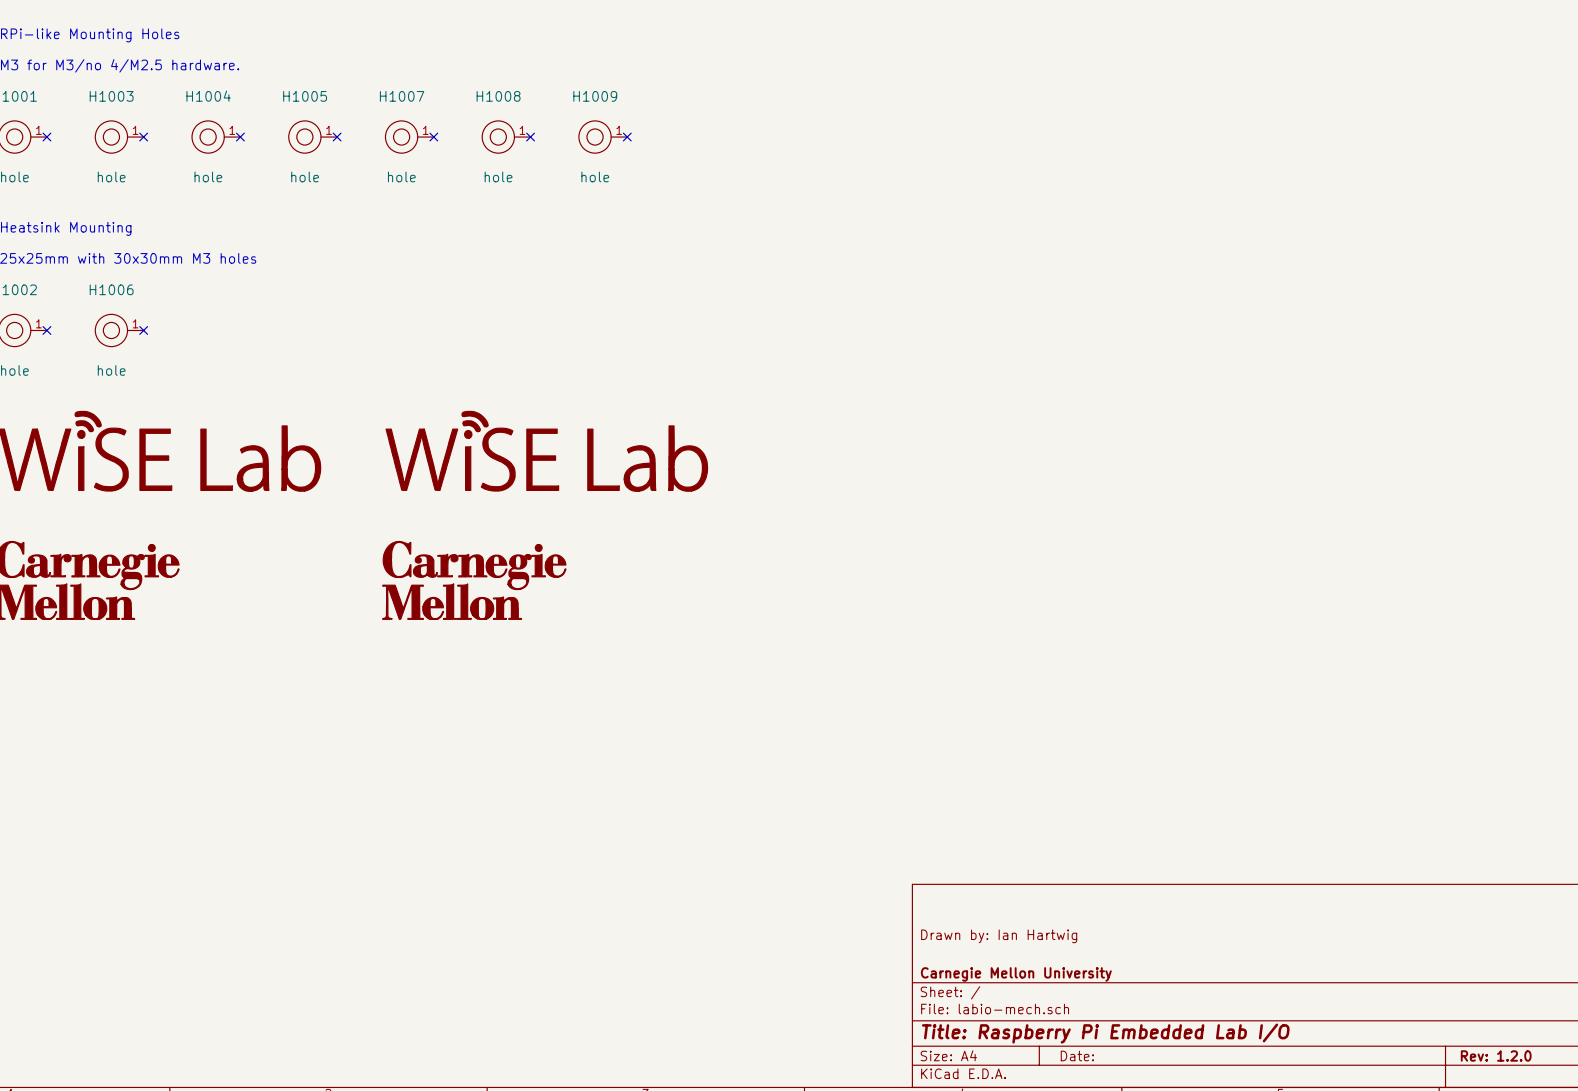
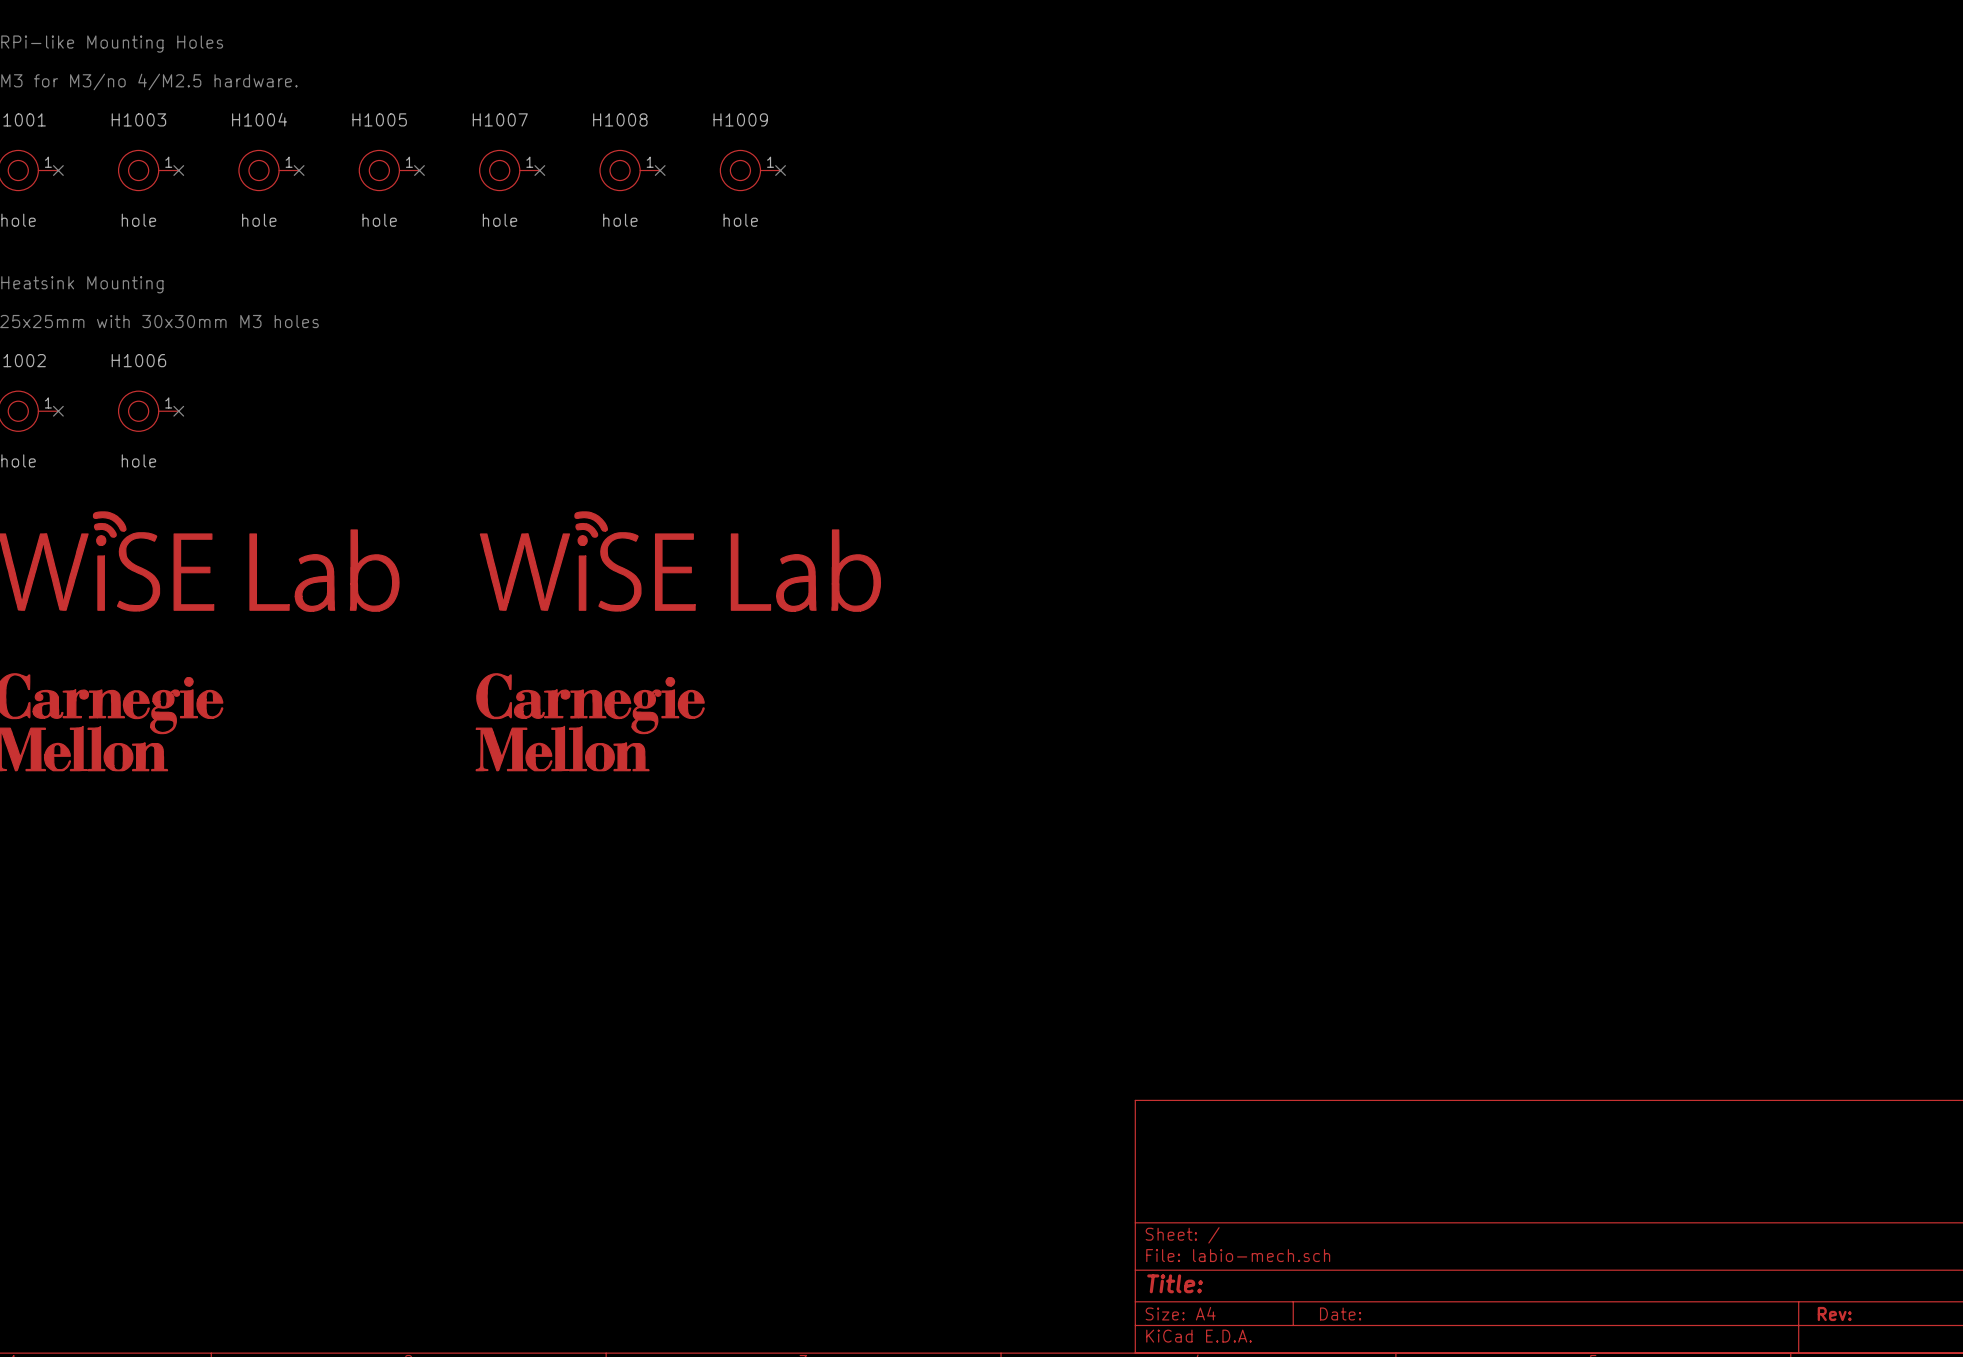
title block: Drawn by: Ian Hartwig (999, 936) -> none
title block: Carnegie Mellon University (1016, 974) -> none
title block: Title: Raspberry Pi Embedded Lab I/O (1105, 1033) -> Title: (1175, 1283)
title block: Rev: 1.2.0 (1496, 1055) -> Rev: (1834, 1313)

